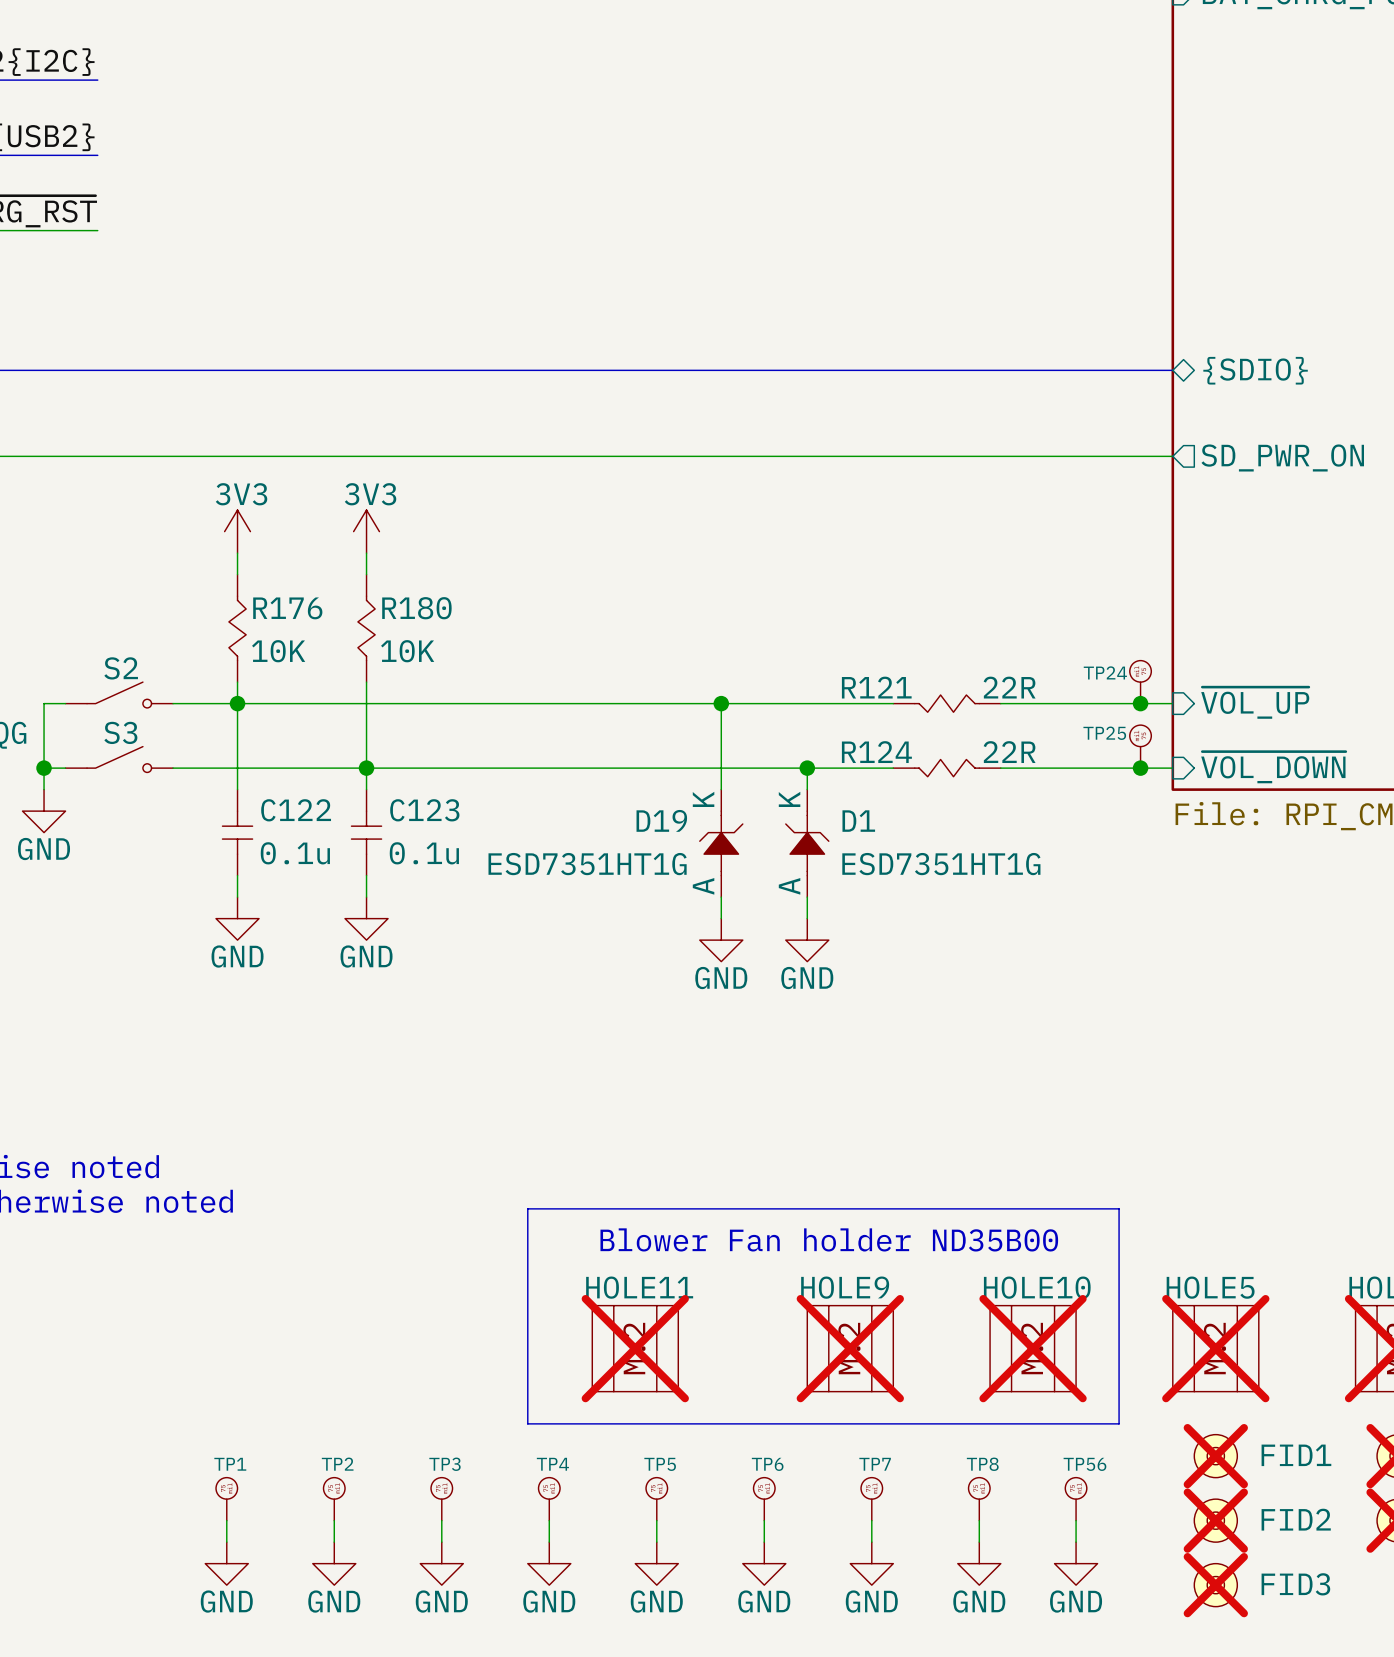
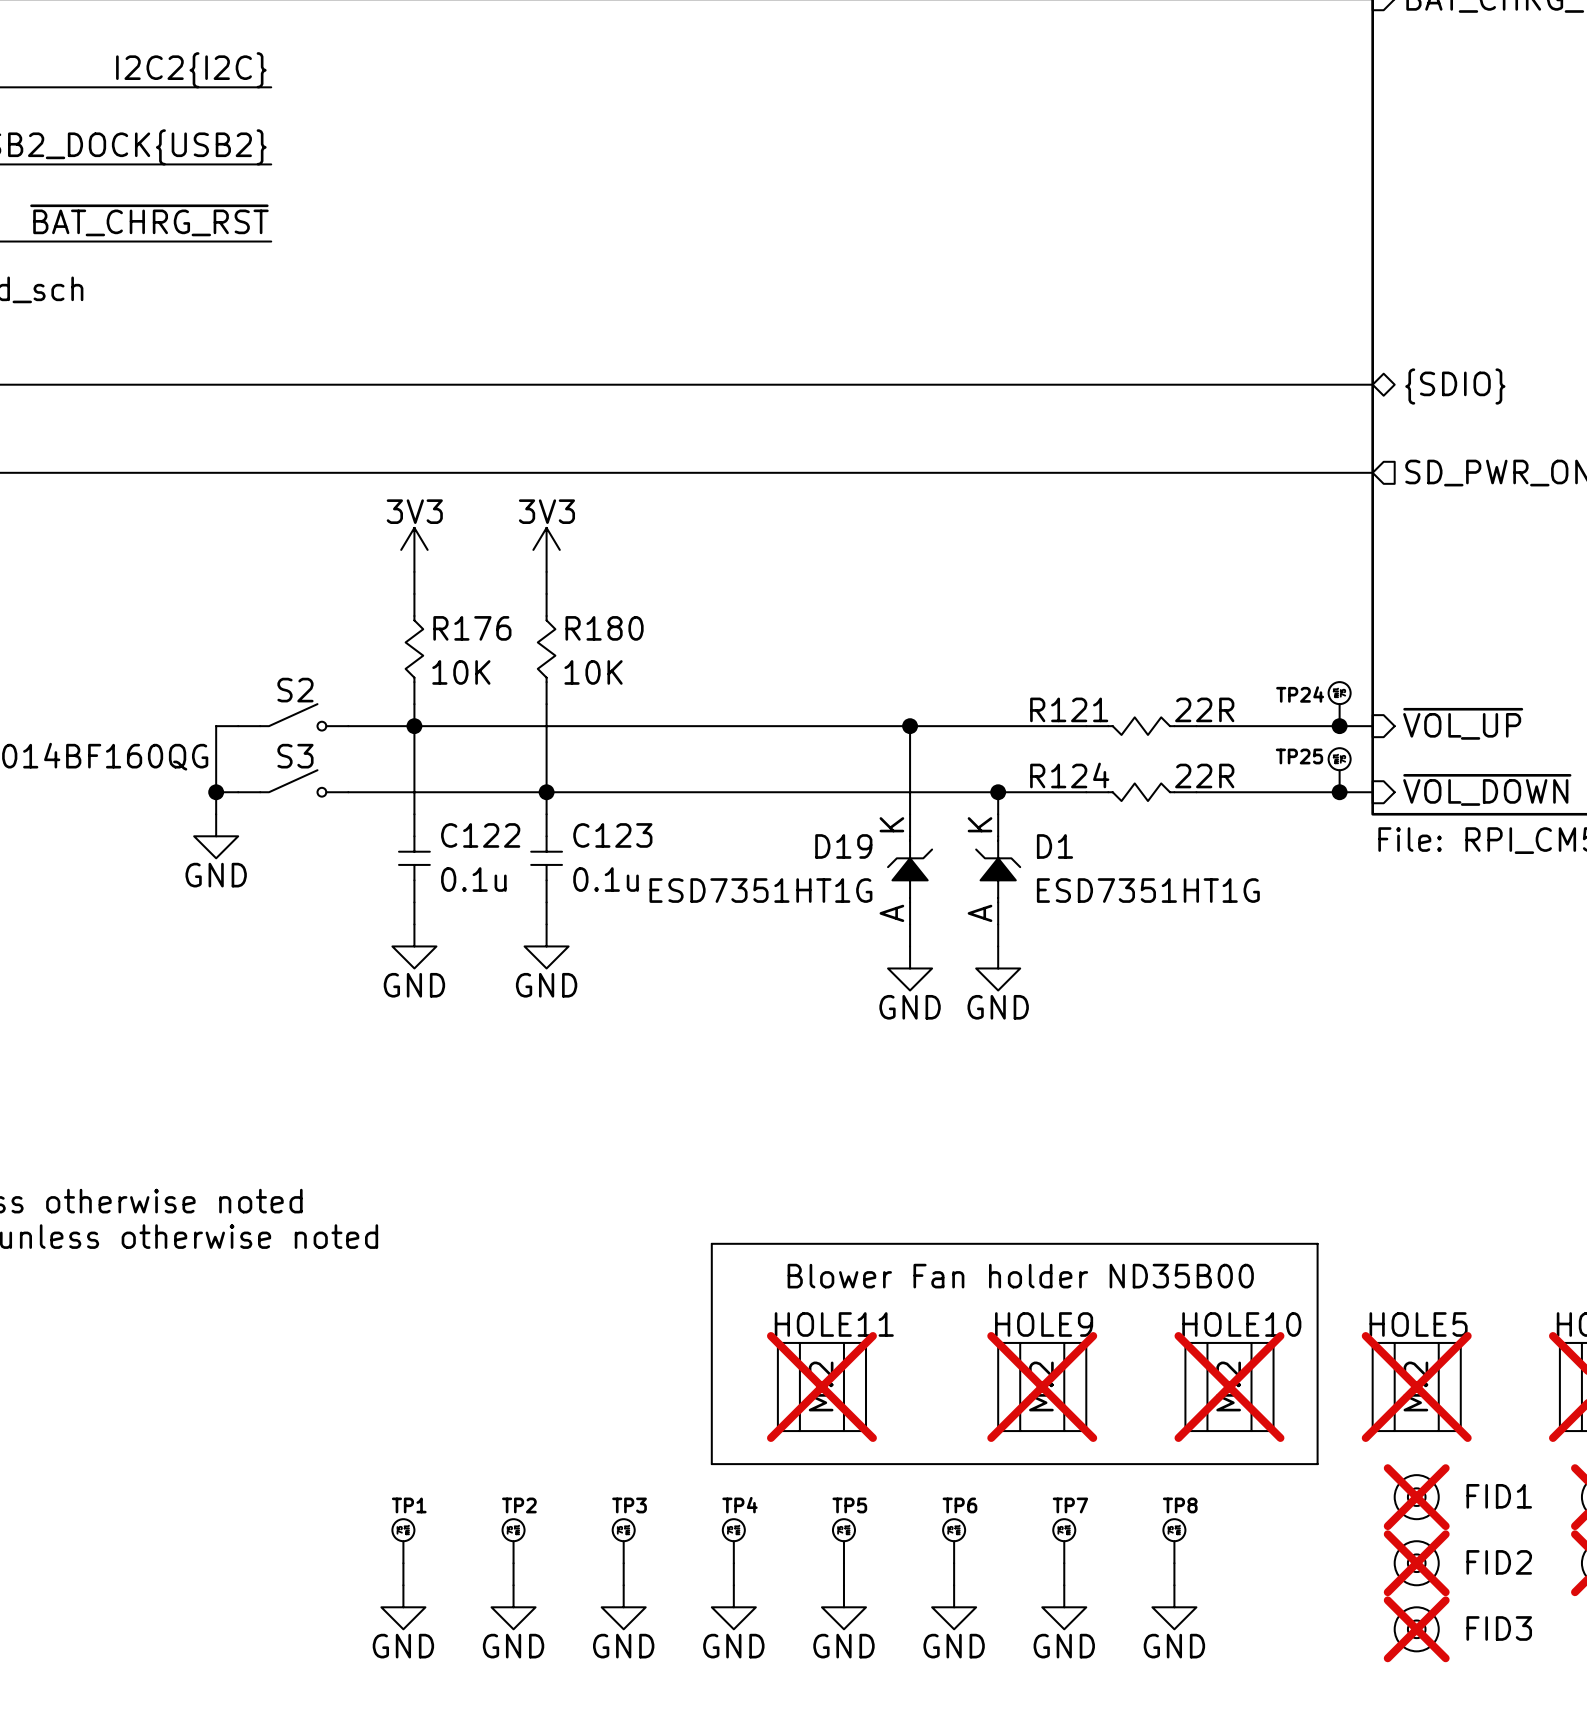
TP56: (1076, 1499) -> none
wire: (1076, 1520) (1076, 1542) -> none
power symbol: GND (1076, 1563) -> none

